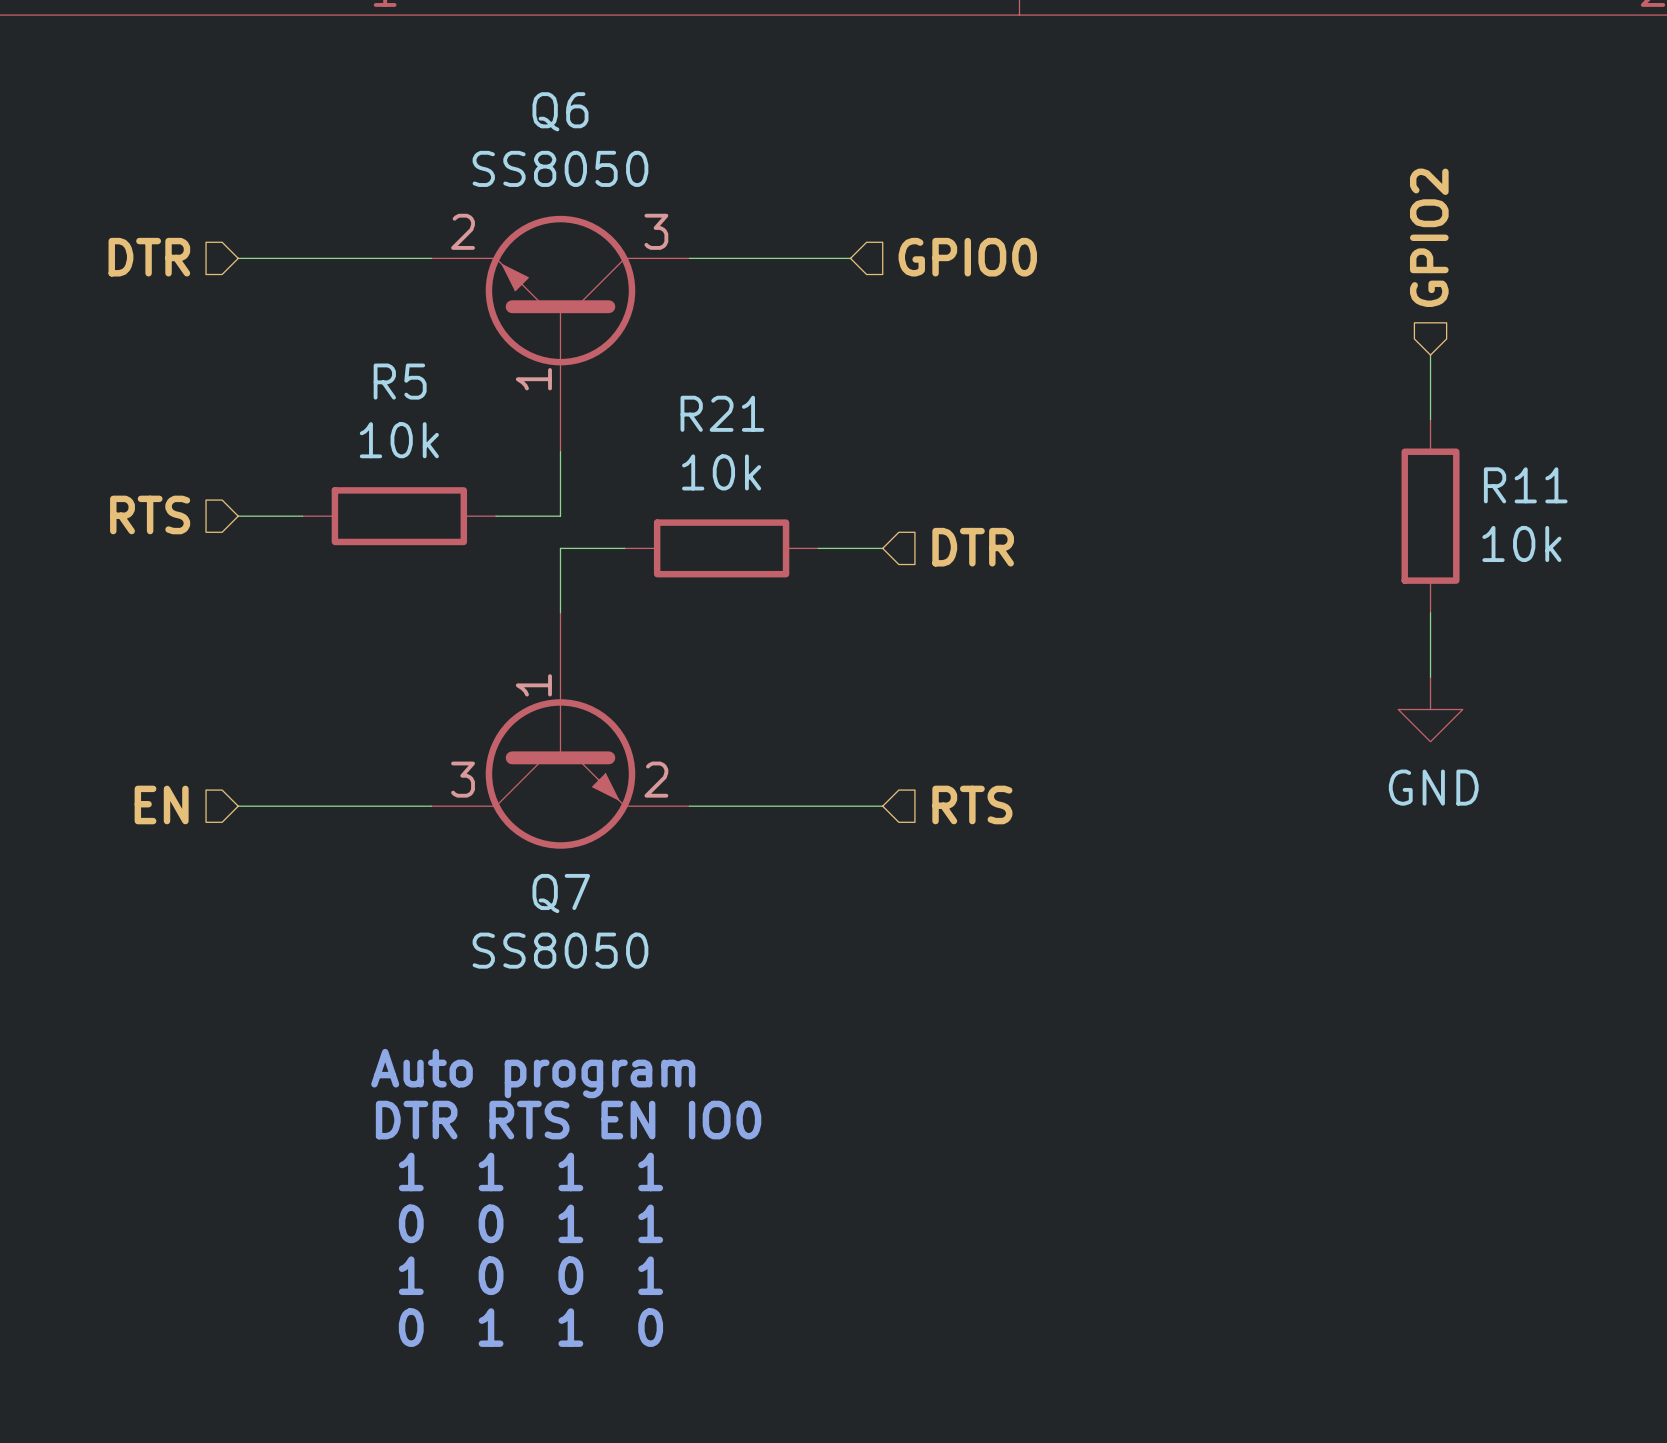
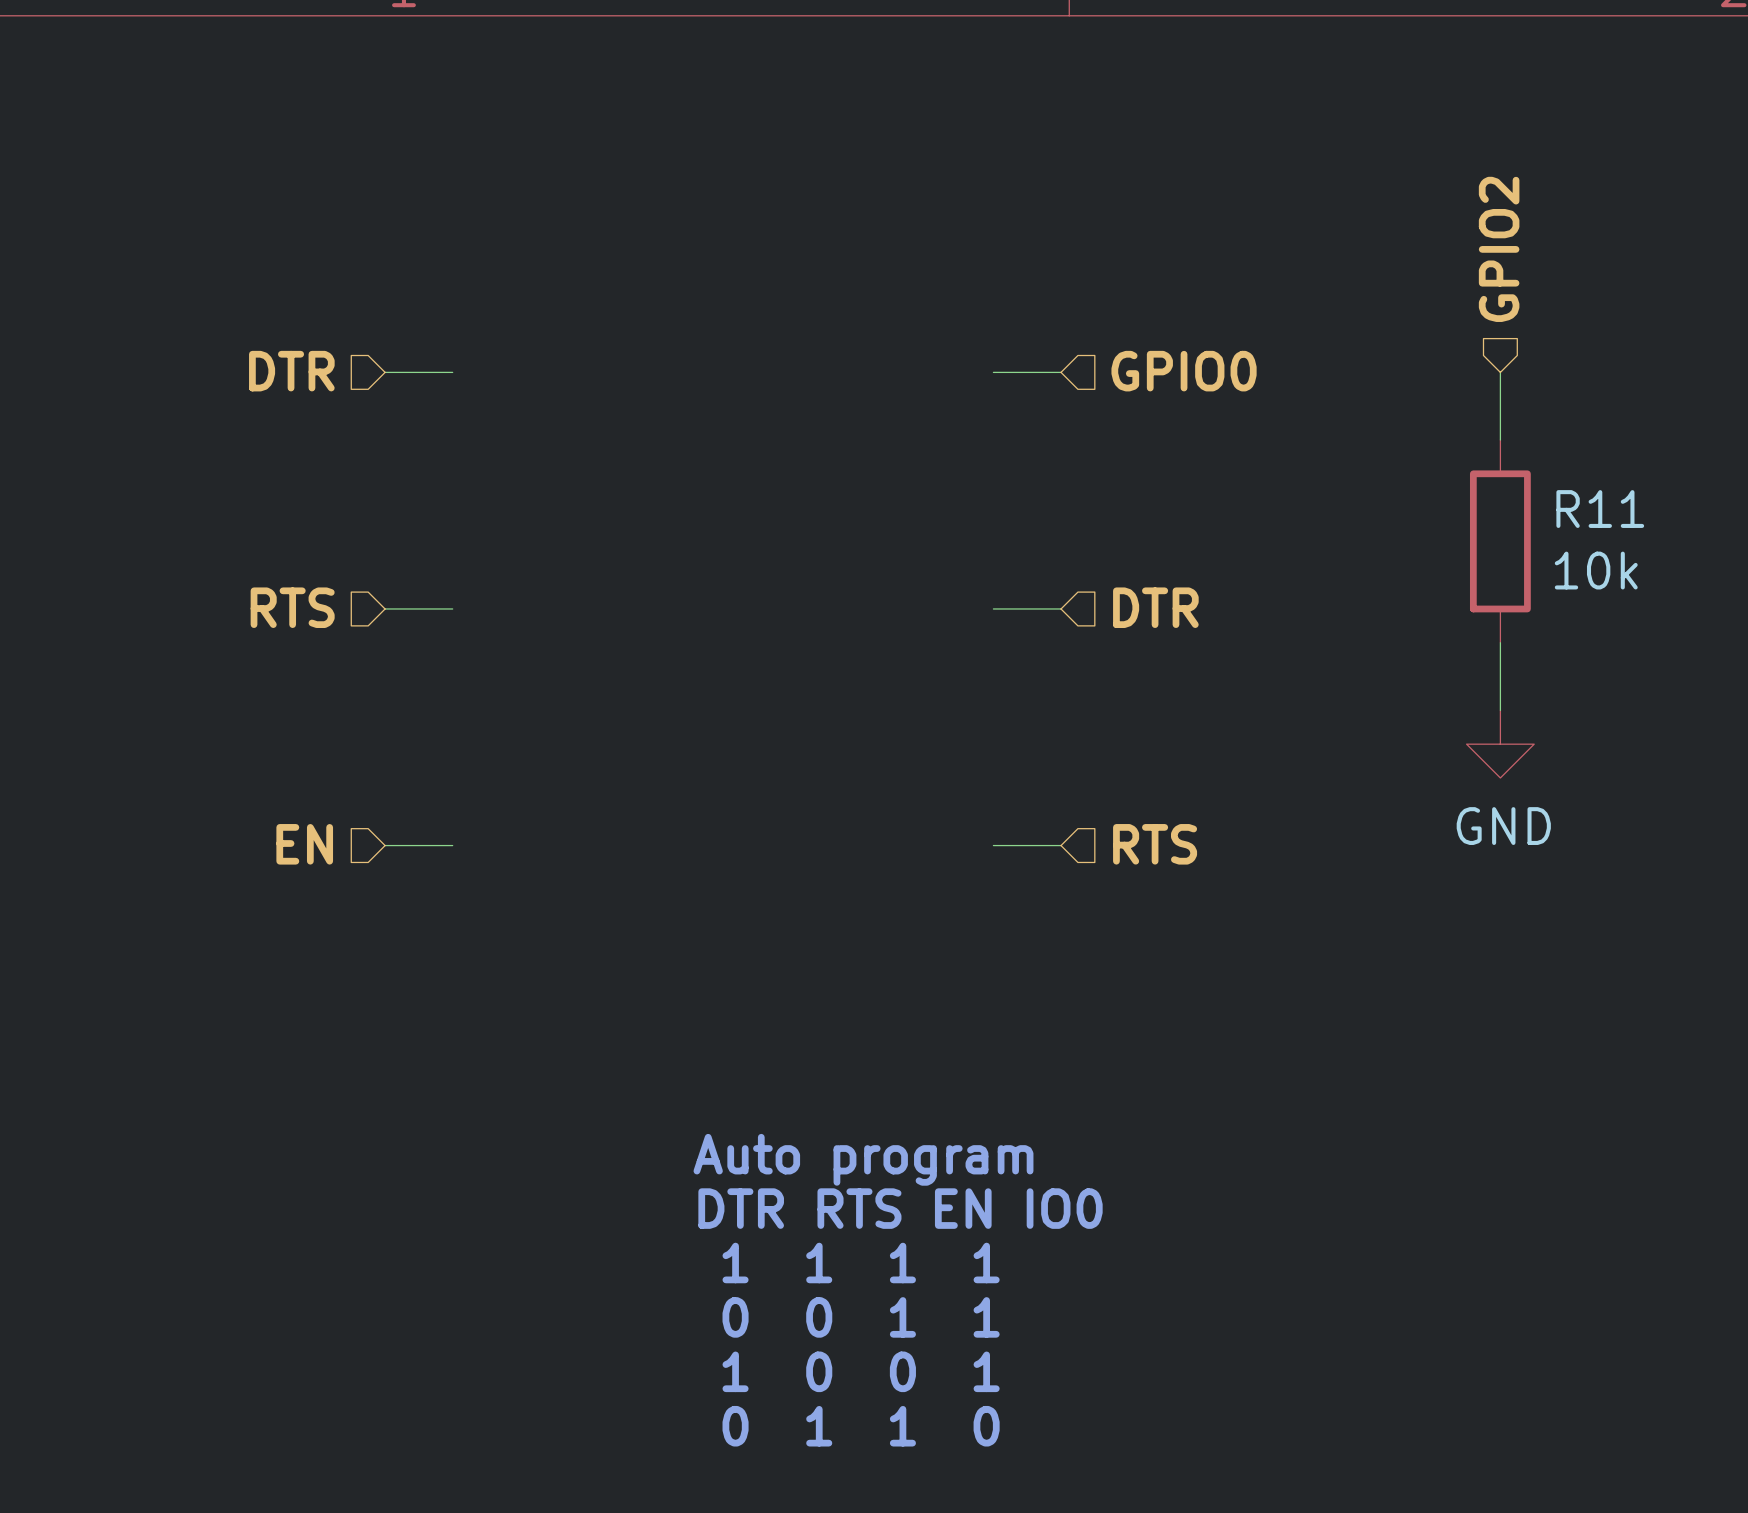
hierarchical label position: DTR (149, 257) -> DTR (291, 371)
hierarchical label position: GPIO0 (967, 257) -> GPIO0 (1184, 371)
wire: (238, 258) (431, 258) -> none
wire: (689, 258) (850, 258) -> none
Q6: SS8050 (560, 333) -> none
wire: none -> (385, 372) (452, 372)
wire: none -> (993, 372) (1061, 372)
wire: (560, 451) (560, 516) (496, 516) -> none
hierarchical label position: RTS (150, 514) -> RTS (292, 607)
wire: (238, 516) (302, 516) -> (385, 608) (452, 608)
R5: 10k (399, 516) -> none
hierarchical label position: DTR (973, 547) -> DTR (1155, 607)
wire: (624, 548) (560, 548) (560, 612) -> none
R21: 10k (721, 548) -> none
wire: (818, 548) (882, 548) -> (993, 608) (1061, 608)
Q7: SS8050 (560, 730) -> none
hierarchical label position: EN (161, 804) -> EN (304, 844)
hierarchical label position: RTS (972, 804) -> RTS (1155, 844)
wire: (238, 806) (367, 806) -> none
wire: (689, 806) (882, 806) -> none
wire: none -> (993, 845) (1061, 845)
text position: Auto program (533, 1073) -> Auto program (863, 1159)
text position: DTR RTS EN IO0 (568, 1120) -> DTR RTS EN IO0 (900, 1208)
text position: 1 1 1 1 (530, 1171) -> 1 1 1 1 (861, 1262)
text position: 0 0 1 1 (530, 1223) -> 0 0 1 1 (861, 1317)
text position: 1 0 0 1 (530, 1275) -> 1 0 0 1 (861, 1371)
text position: 0 1 1 0 (530, 1327) -> 0 1 1 0 (861, 1426)

